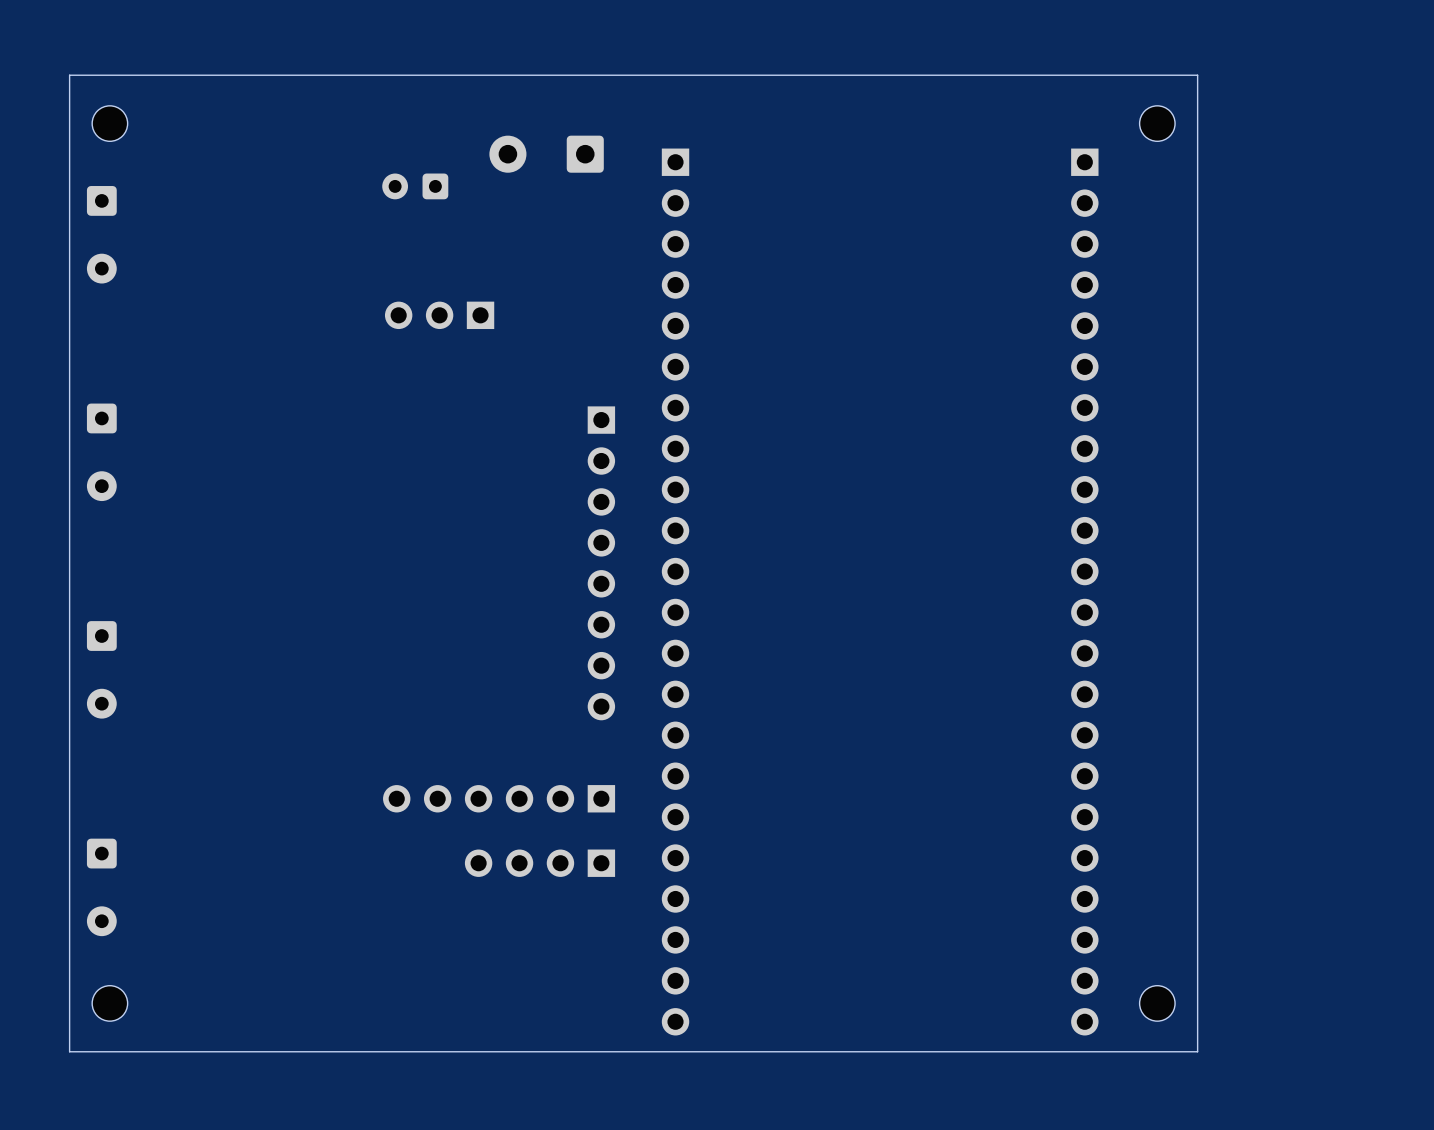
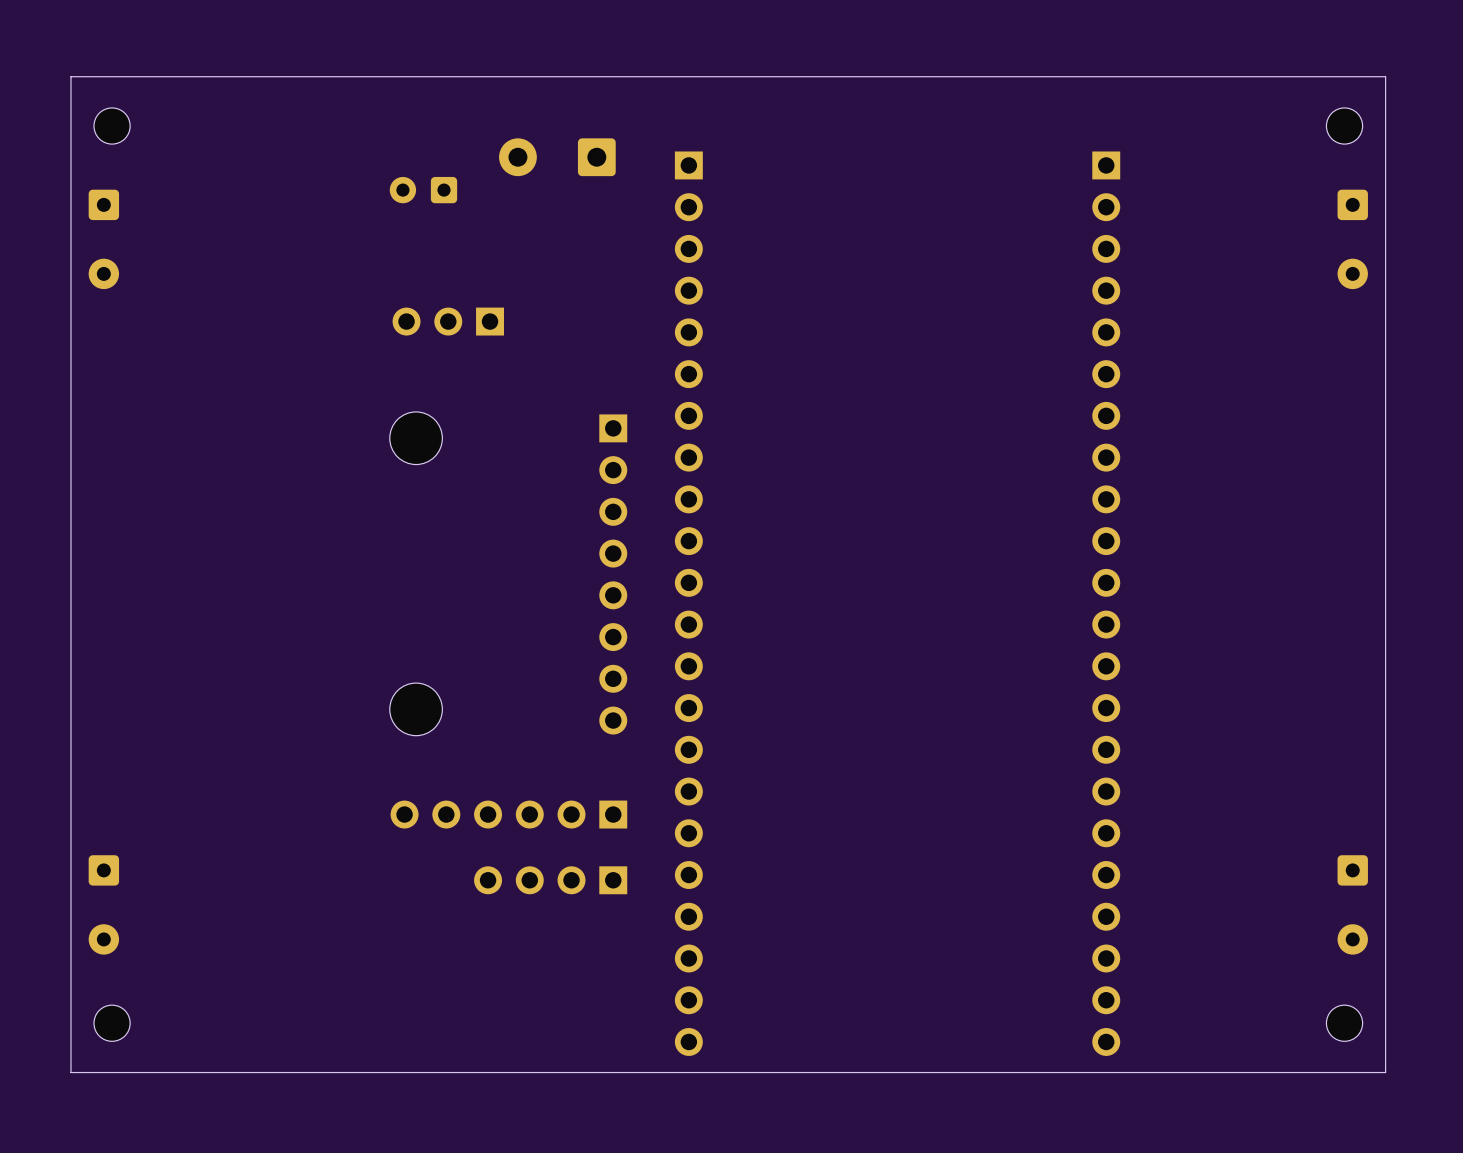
board edge: (1197, 75) (1197, 1051) -> (1221, 76) (1385, 76) (1385, 1072) (1221, 1072)
part position: (1157, 123) -> (1344, 126)
part: none -> (1352, 239)
part: none -> (416, 438)
part: (101, 452) -> none
part: (101, 669) -> none
part: none -> (416, 709)
part: none -> (1352, 904)
part position: (1157, 1003) -> (1344, 1023)

